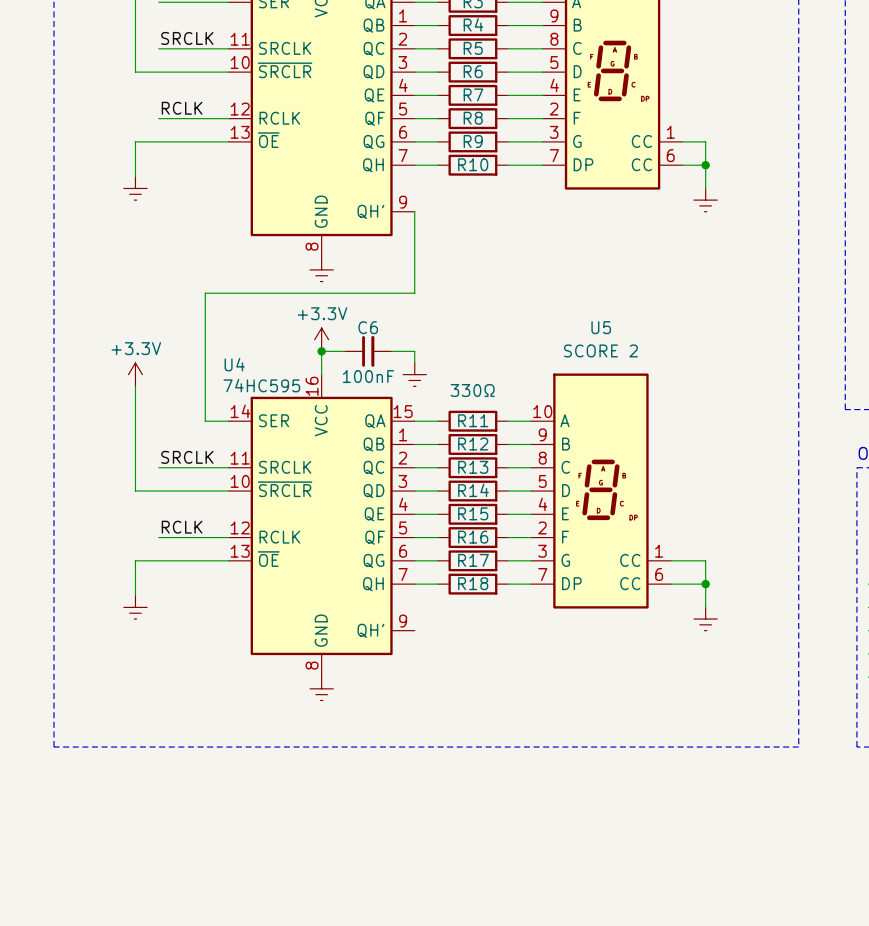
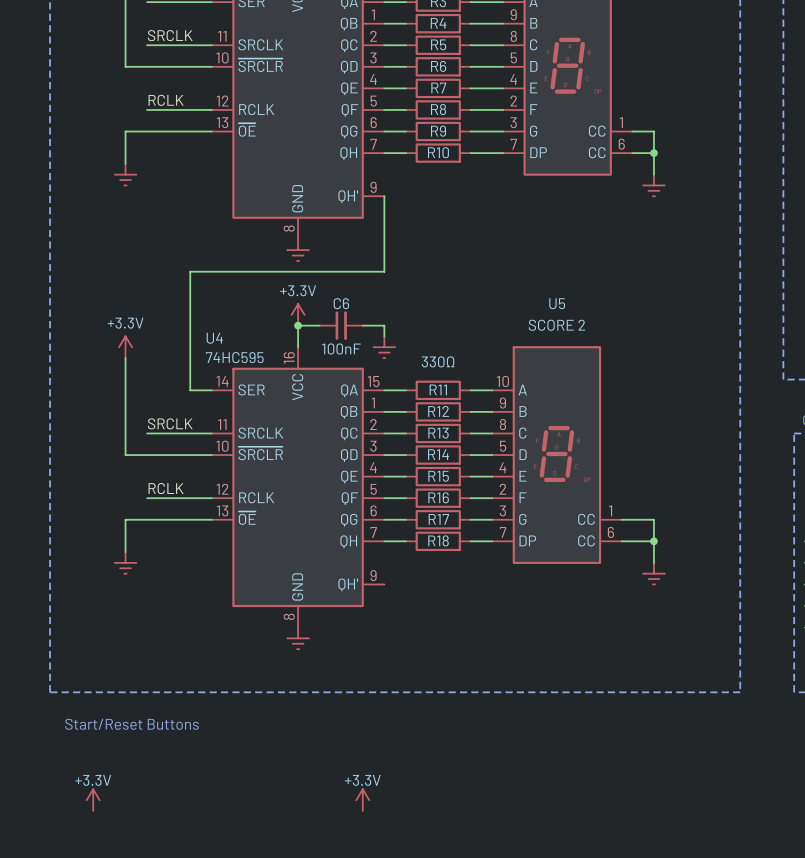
text: none -> Start/Reset Buttons (132, 724)
power symbol: none -> +3.3V (93, 800)
power symbol: none -> +3.3V (362, 800)

